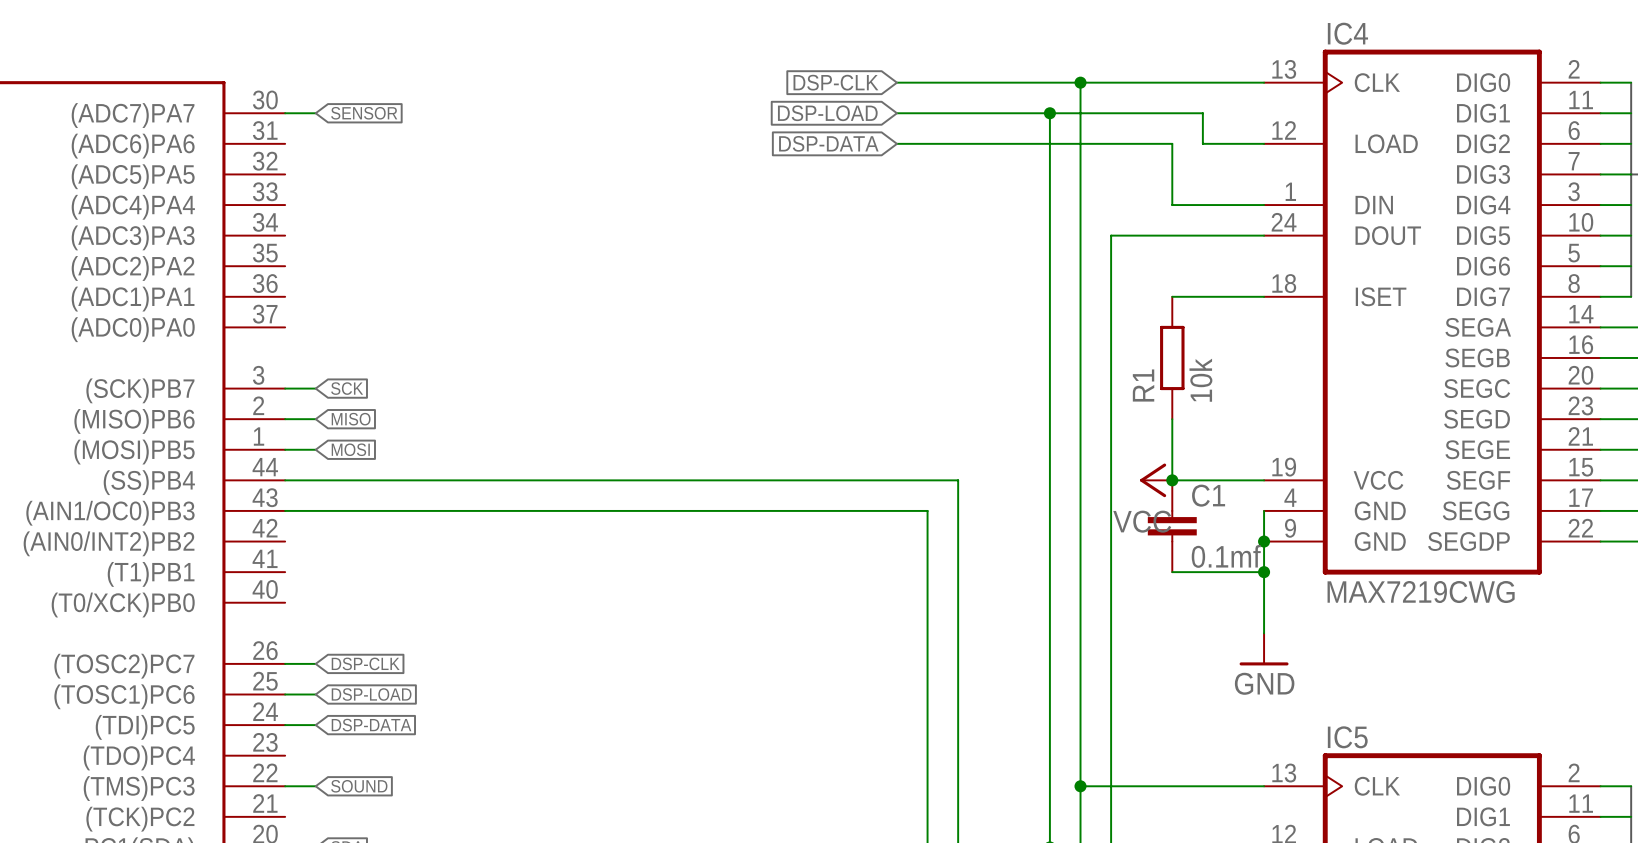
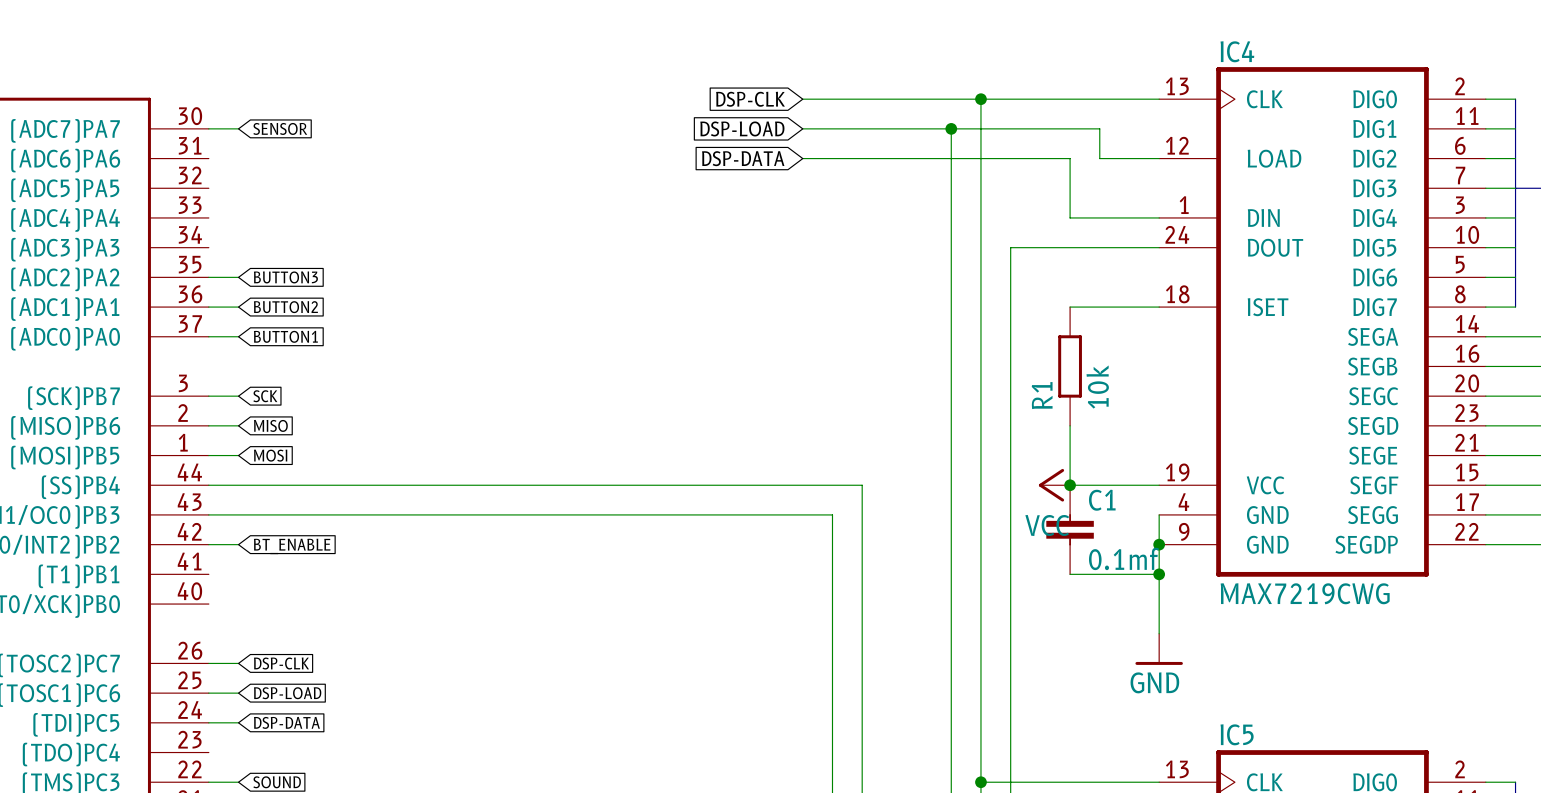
wire: none -> (208, 277) (238, 277)
global label: none -> BUTTON3 (285, 277)
wire: none -> (208, 307) (238, 307)
global label: none -> BUTTON2 (285, 307)
wire: none -> (208, 336) (238, 336)
global label: none -> BUTTON1 (285, 336)
wire: none -> (208, 544) (238, 544)
global label: none -> BT_ENABLE (292, 546)

